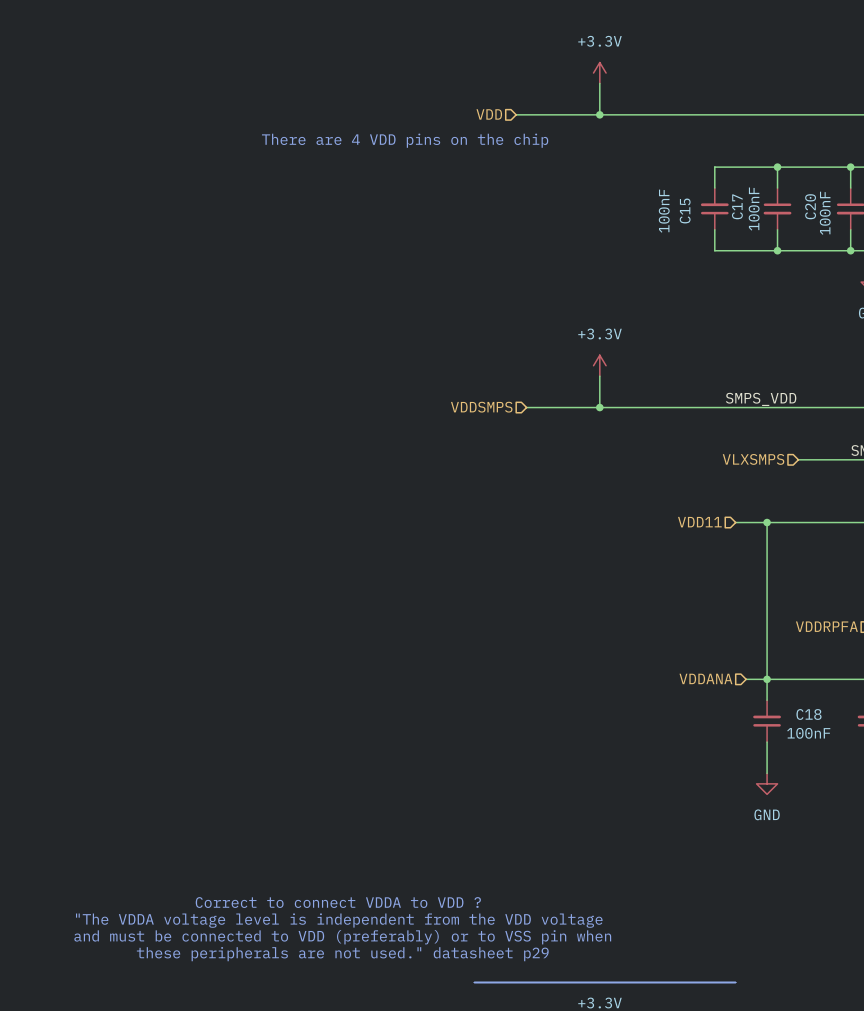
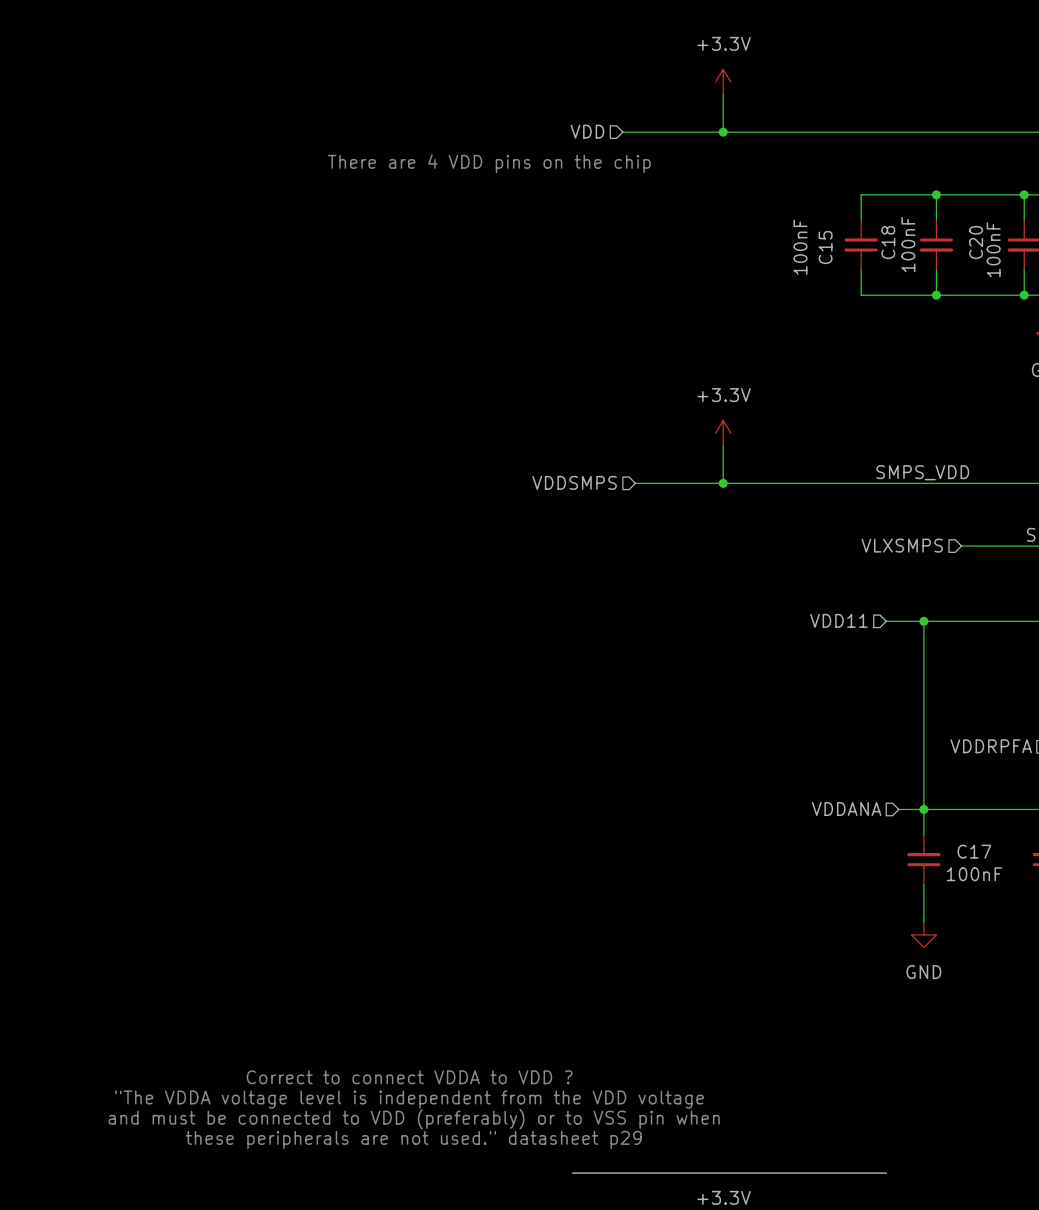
C17 name: C17 (737, 206) -> C18 (888, 242)
C18 name: C18 (808, 714) -> C17 (974, 851)

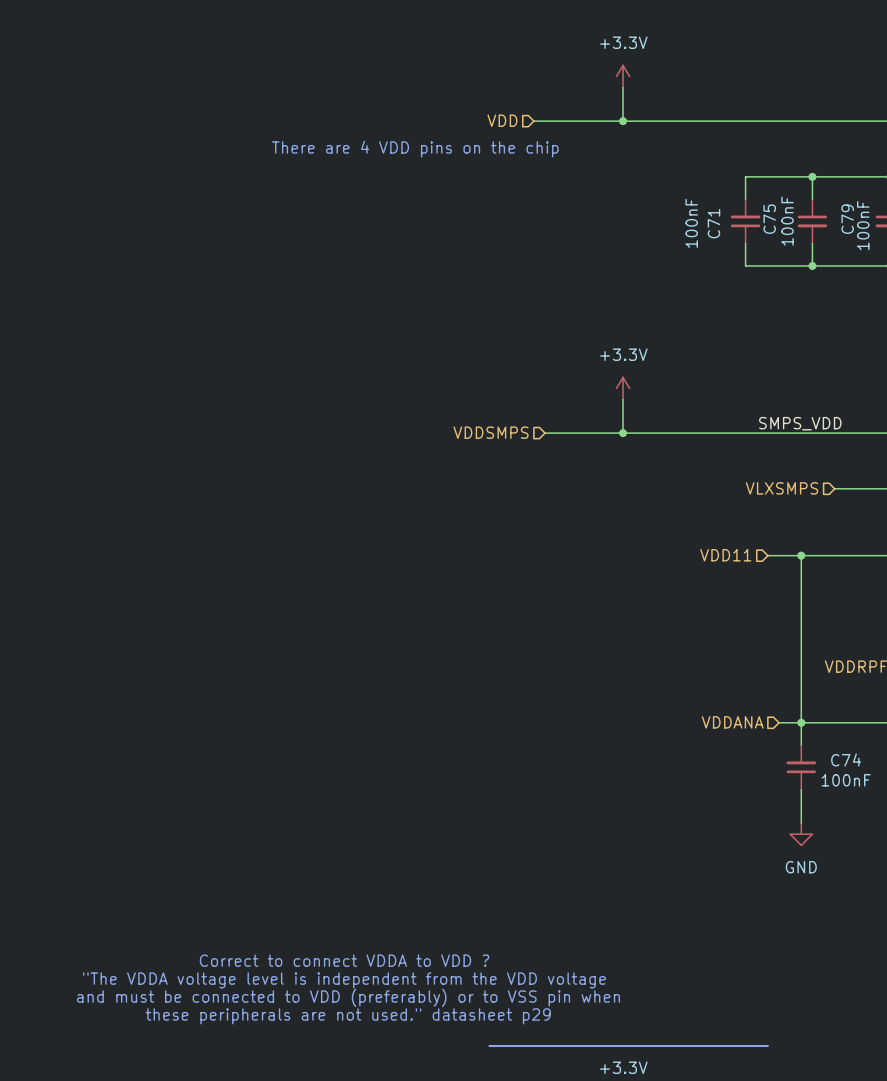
C18 name: C18 (888, 242) -> C75 (769, 219)
C20 name: C20 (976, 242) -> C79 (847, 219)
C15 name: C15 (825, 247) -> C71 (713, 223)
C17 name: C17 (974, 851) -> C74 (846, 759)

